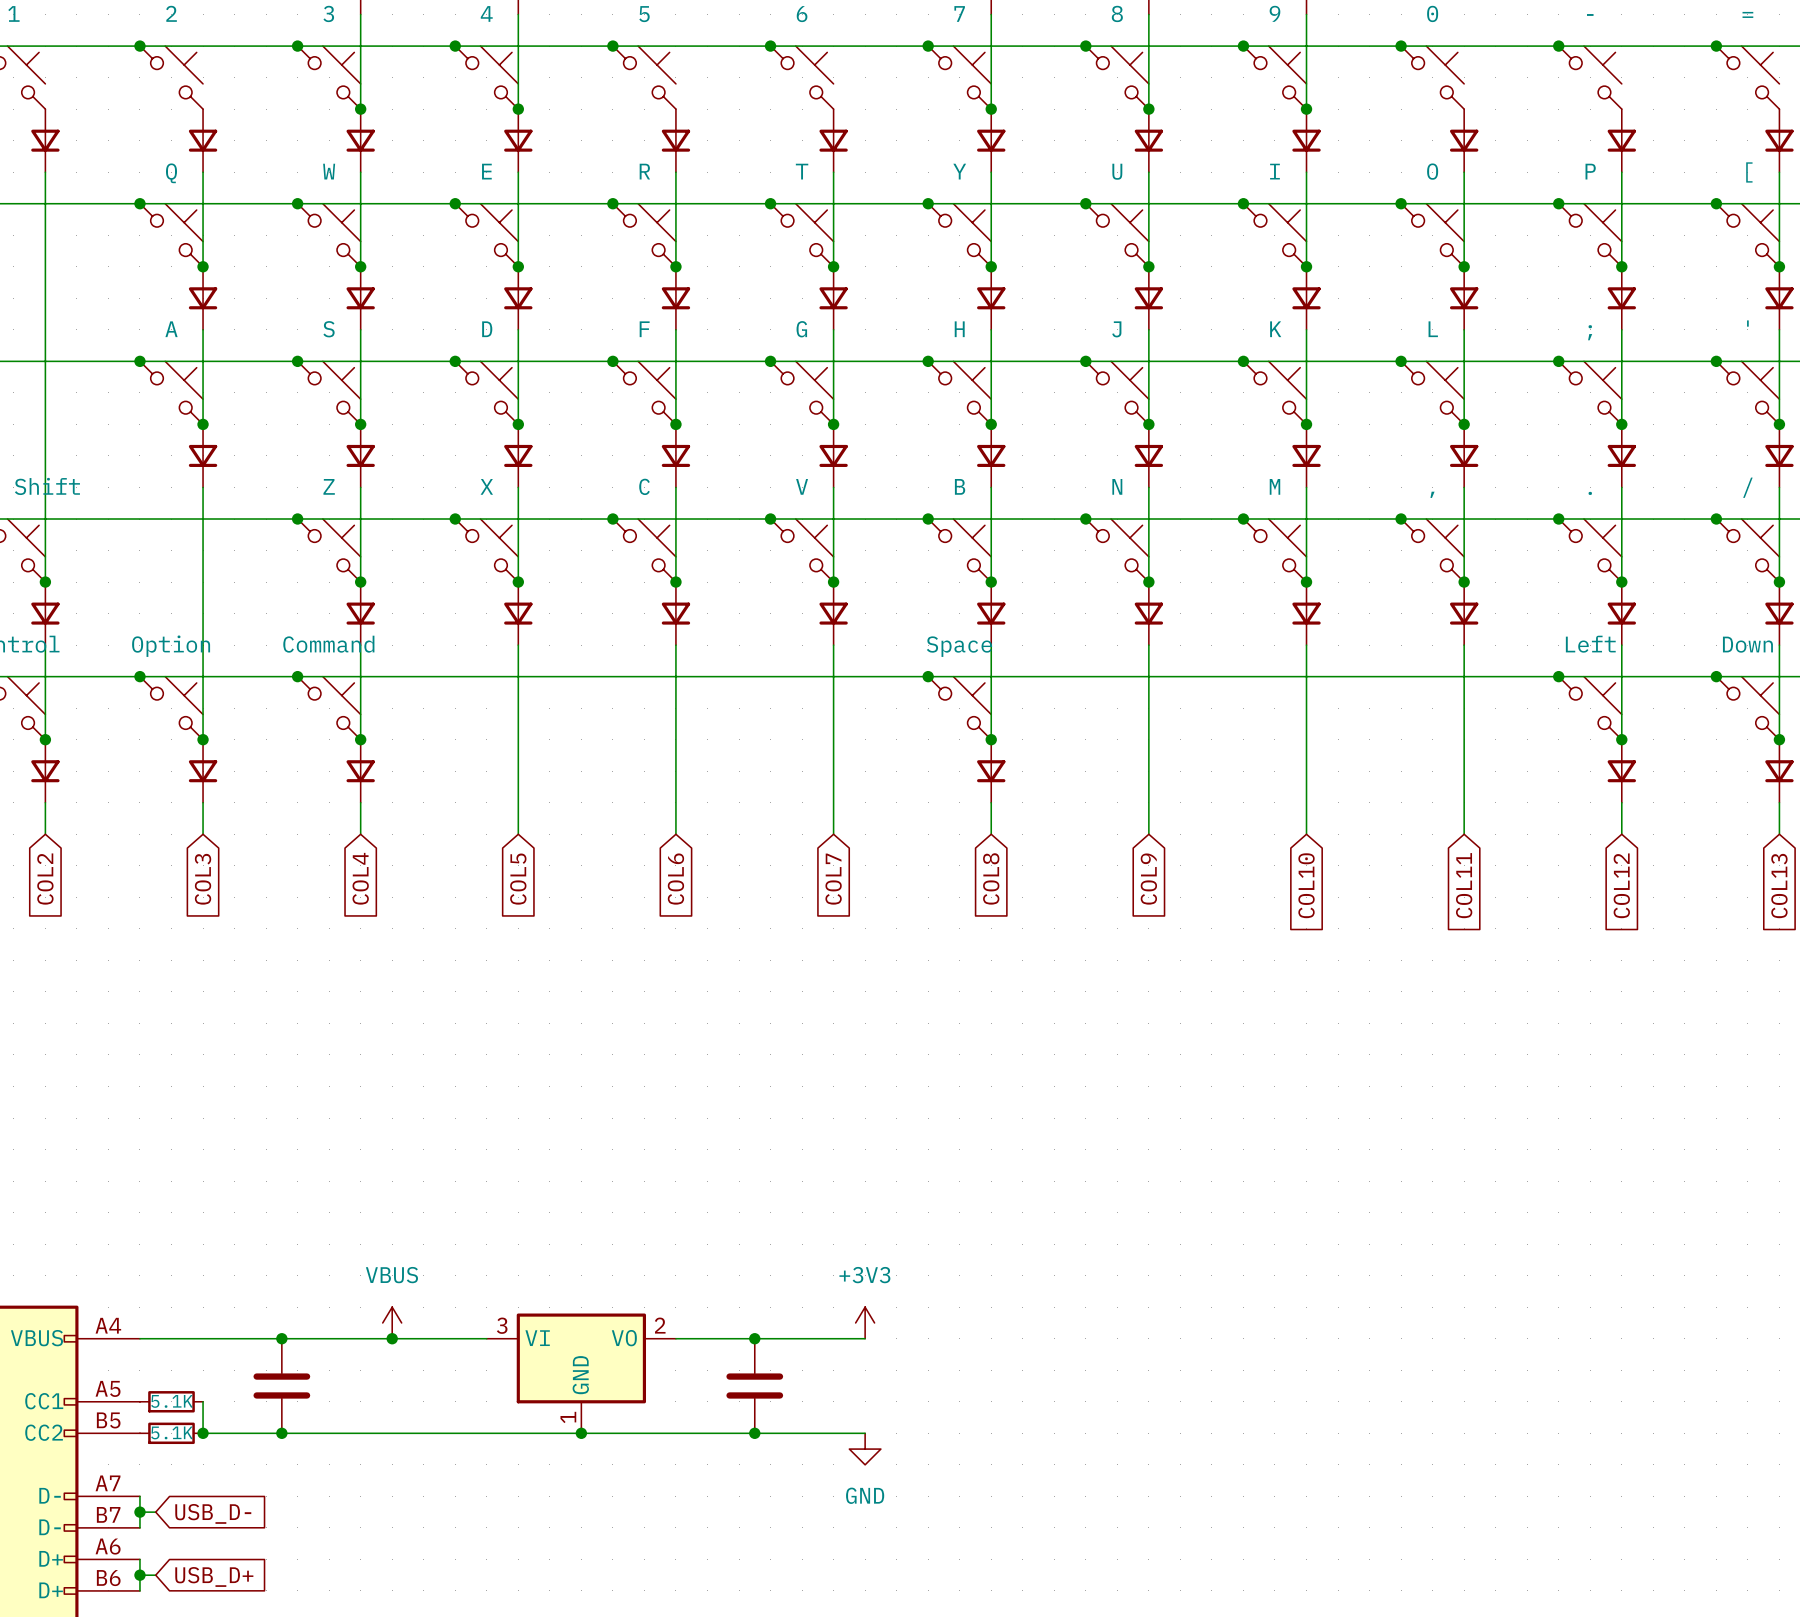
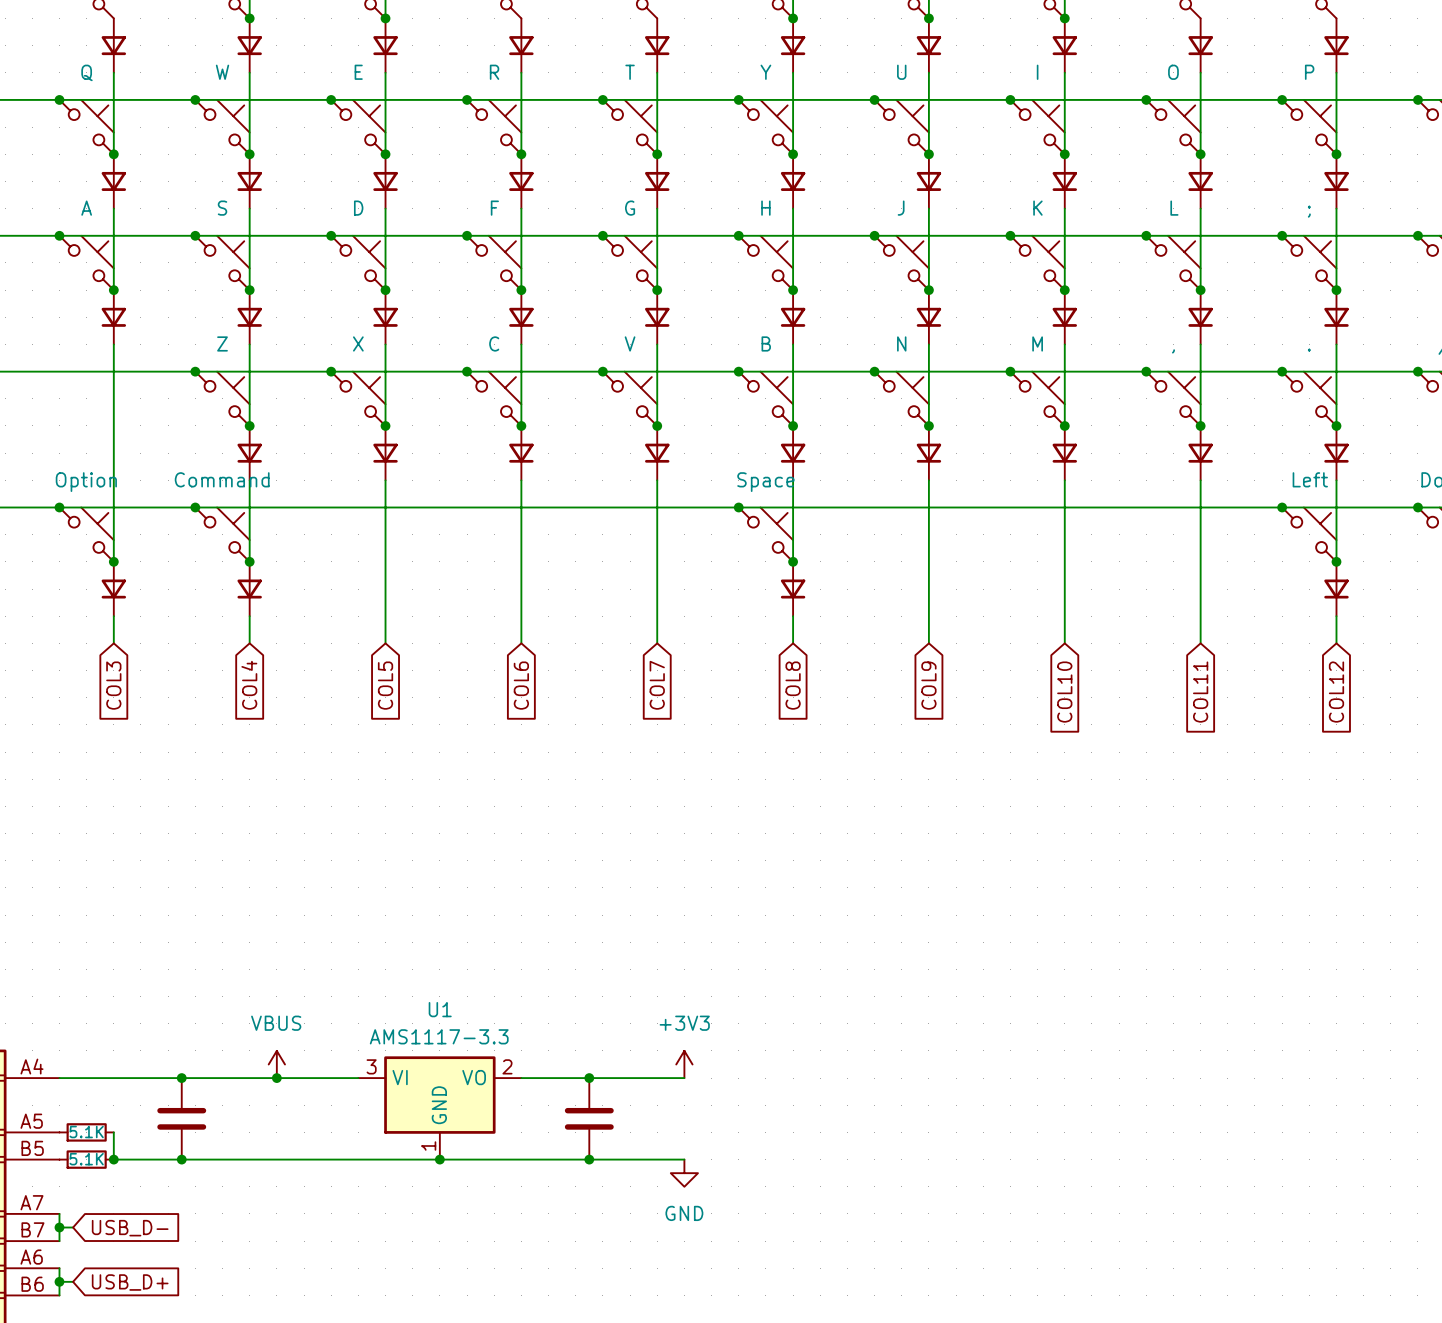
U1 name: none -> U1 (440, 1009)
U1 value: none -> AMS1117-3.3 (439, 1036)

